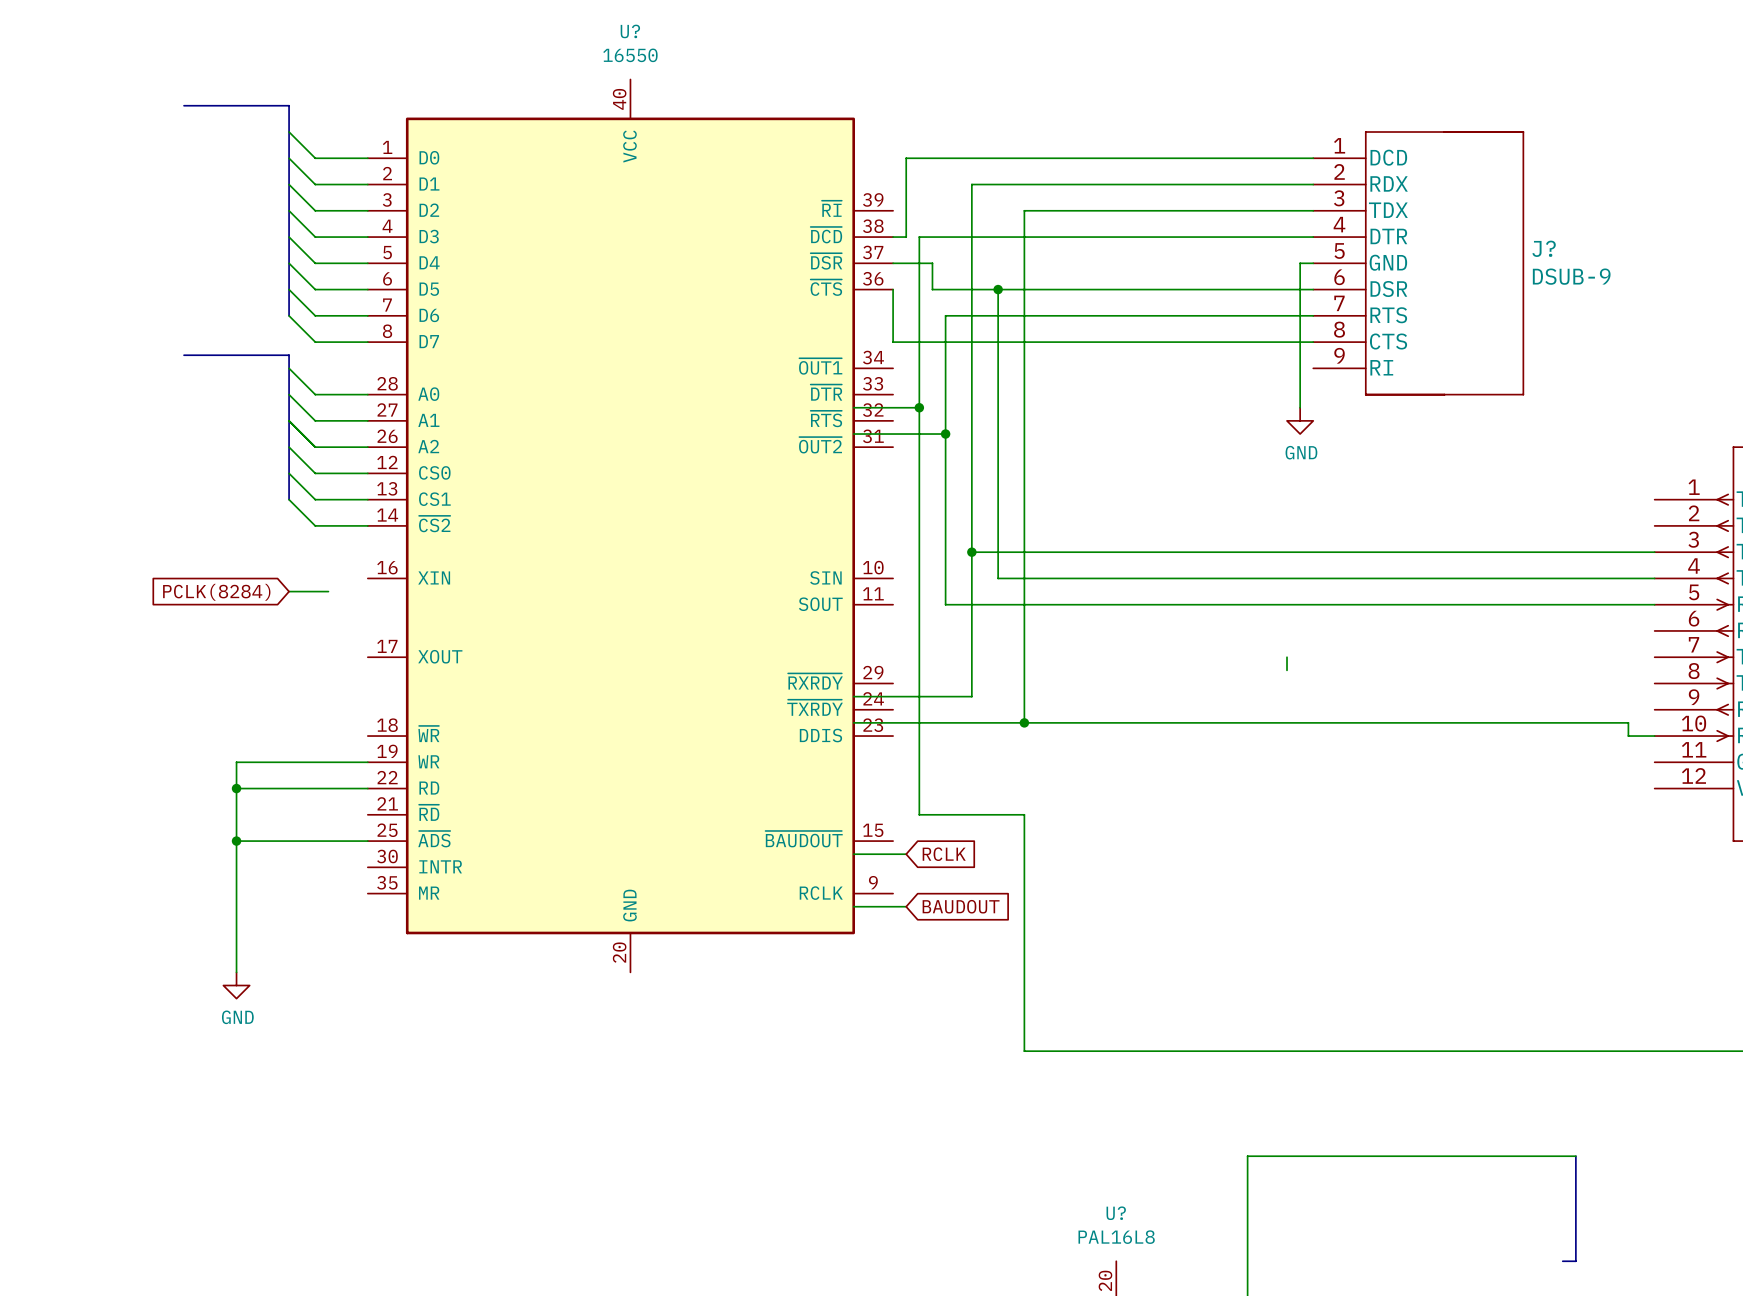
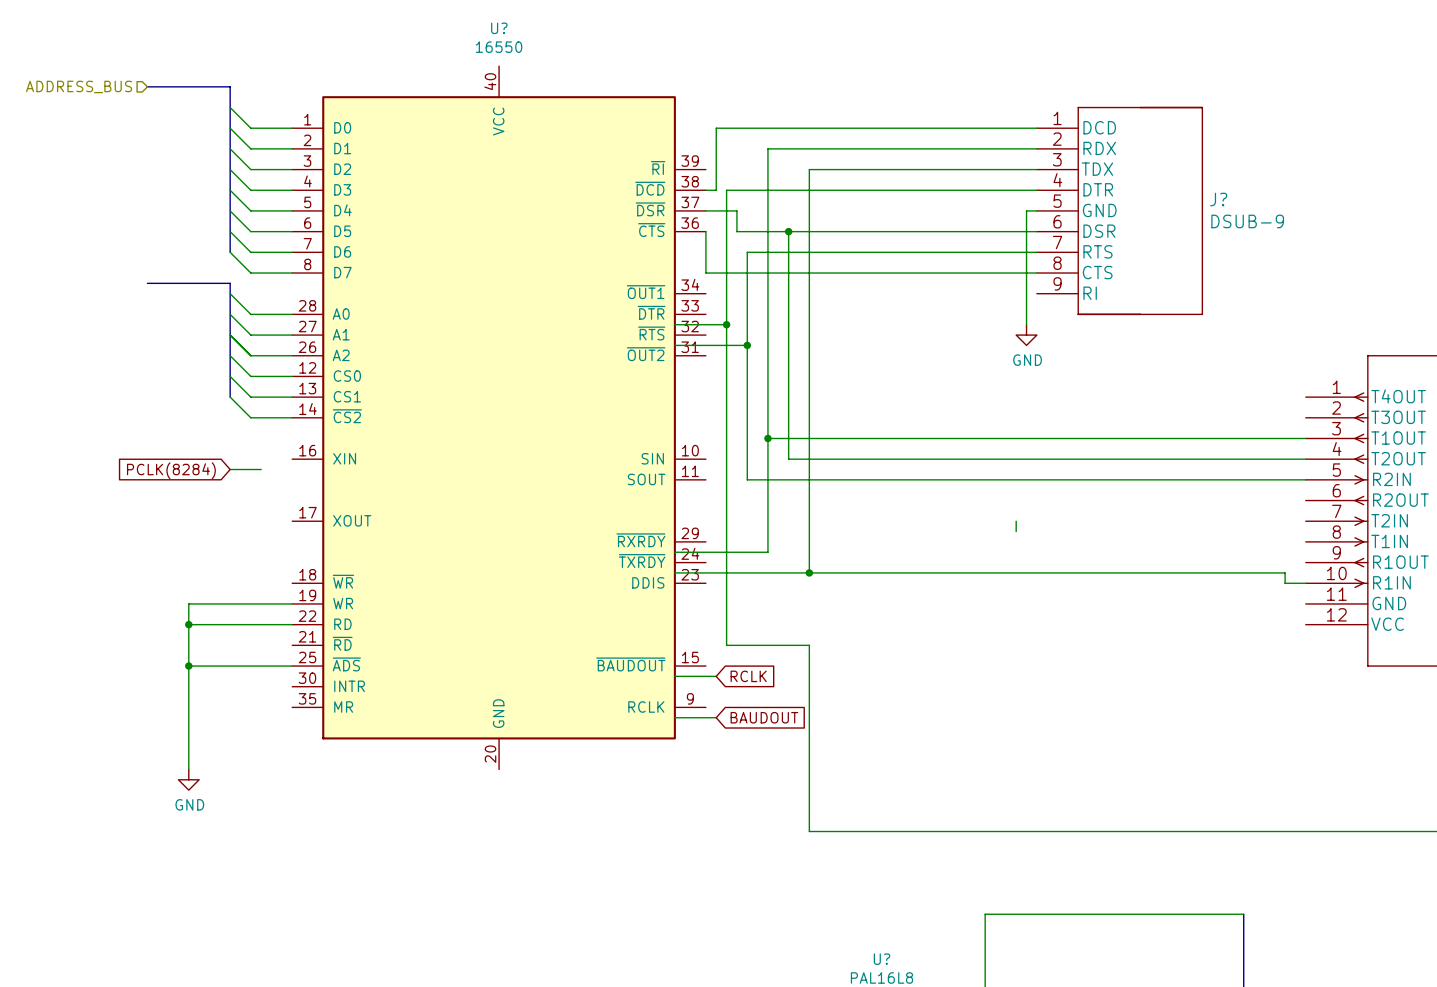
hierarchical label: none -> ADDRESS_BUS (79, 86)

